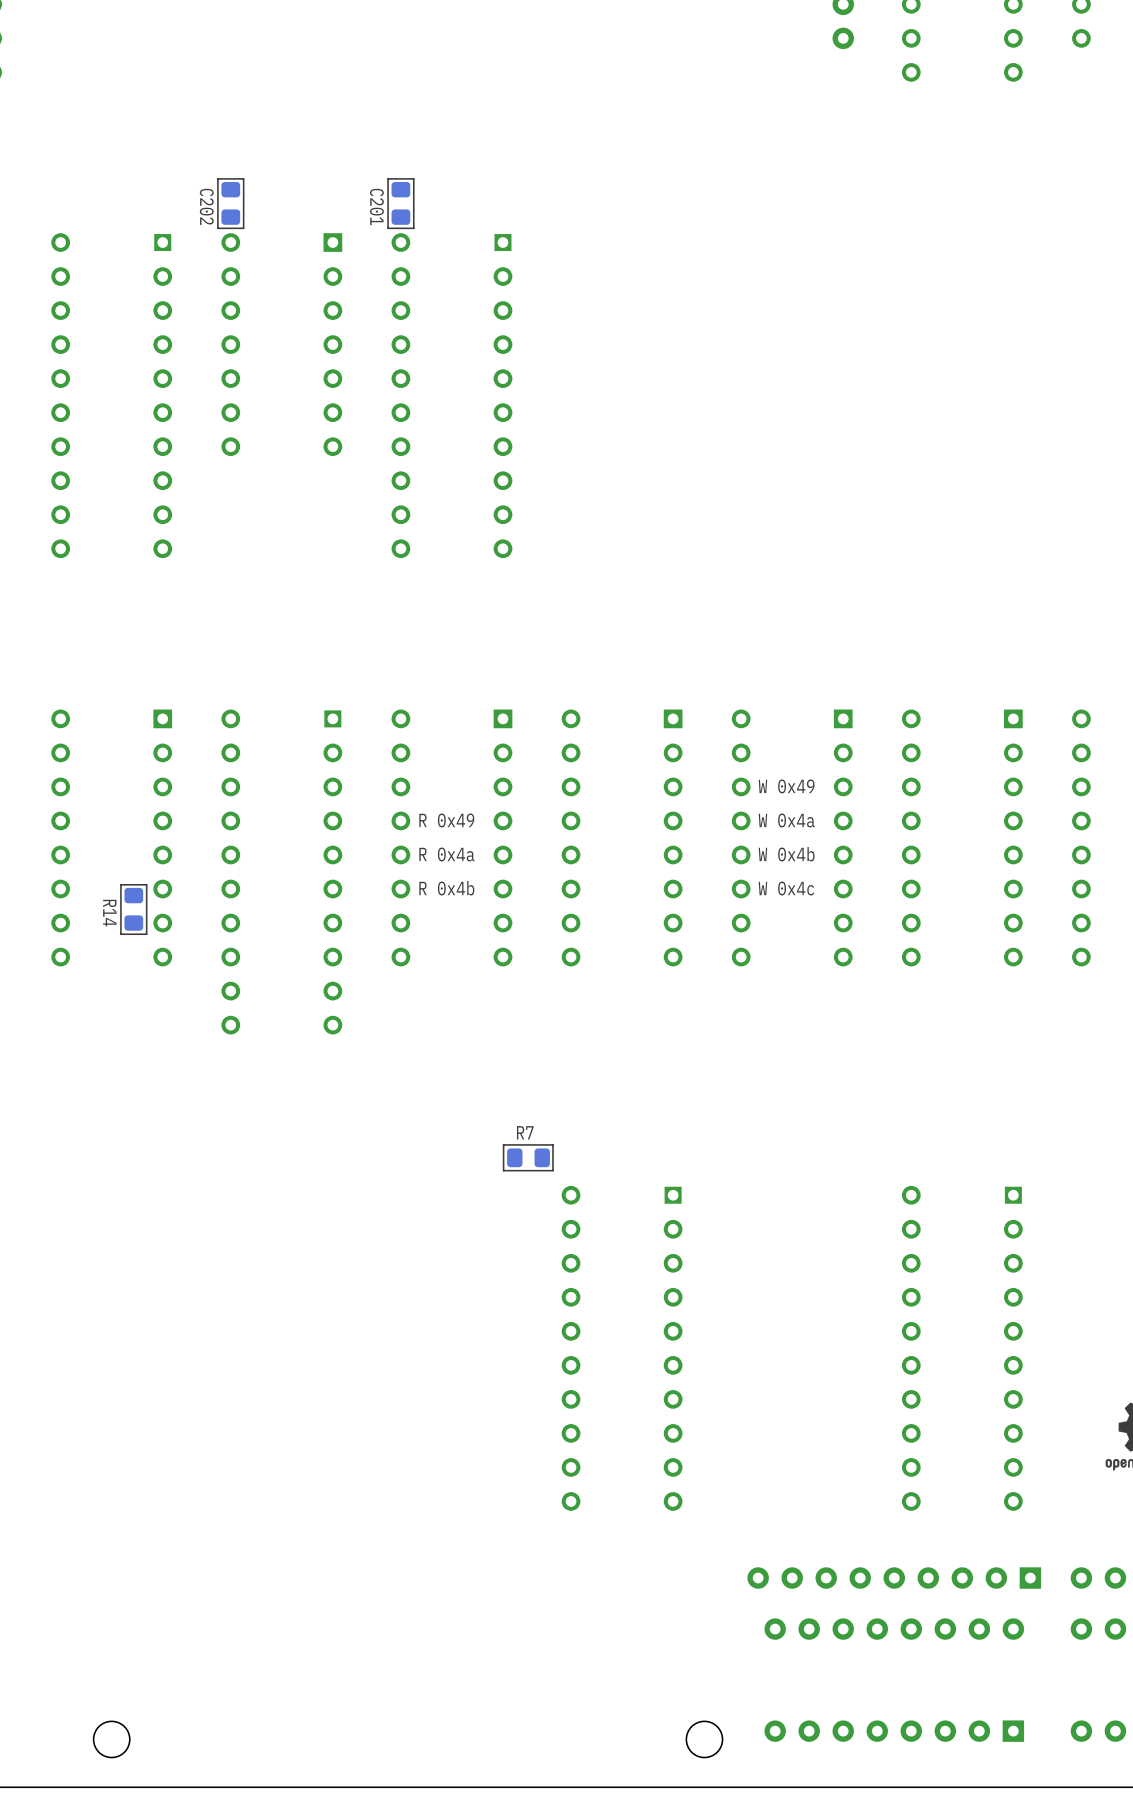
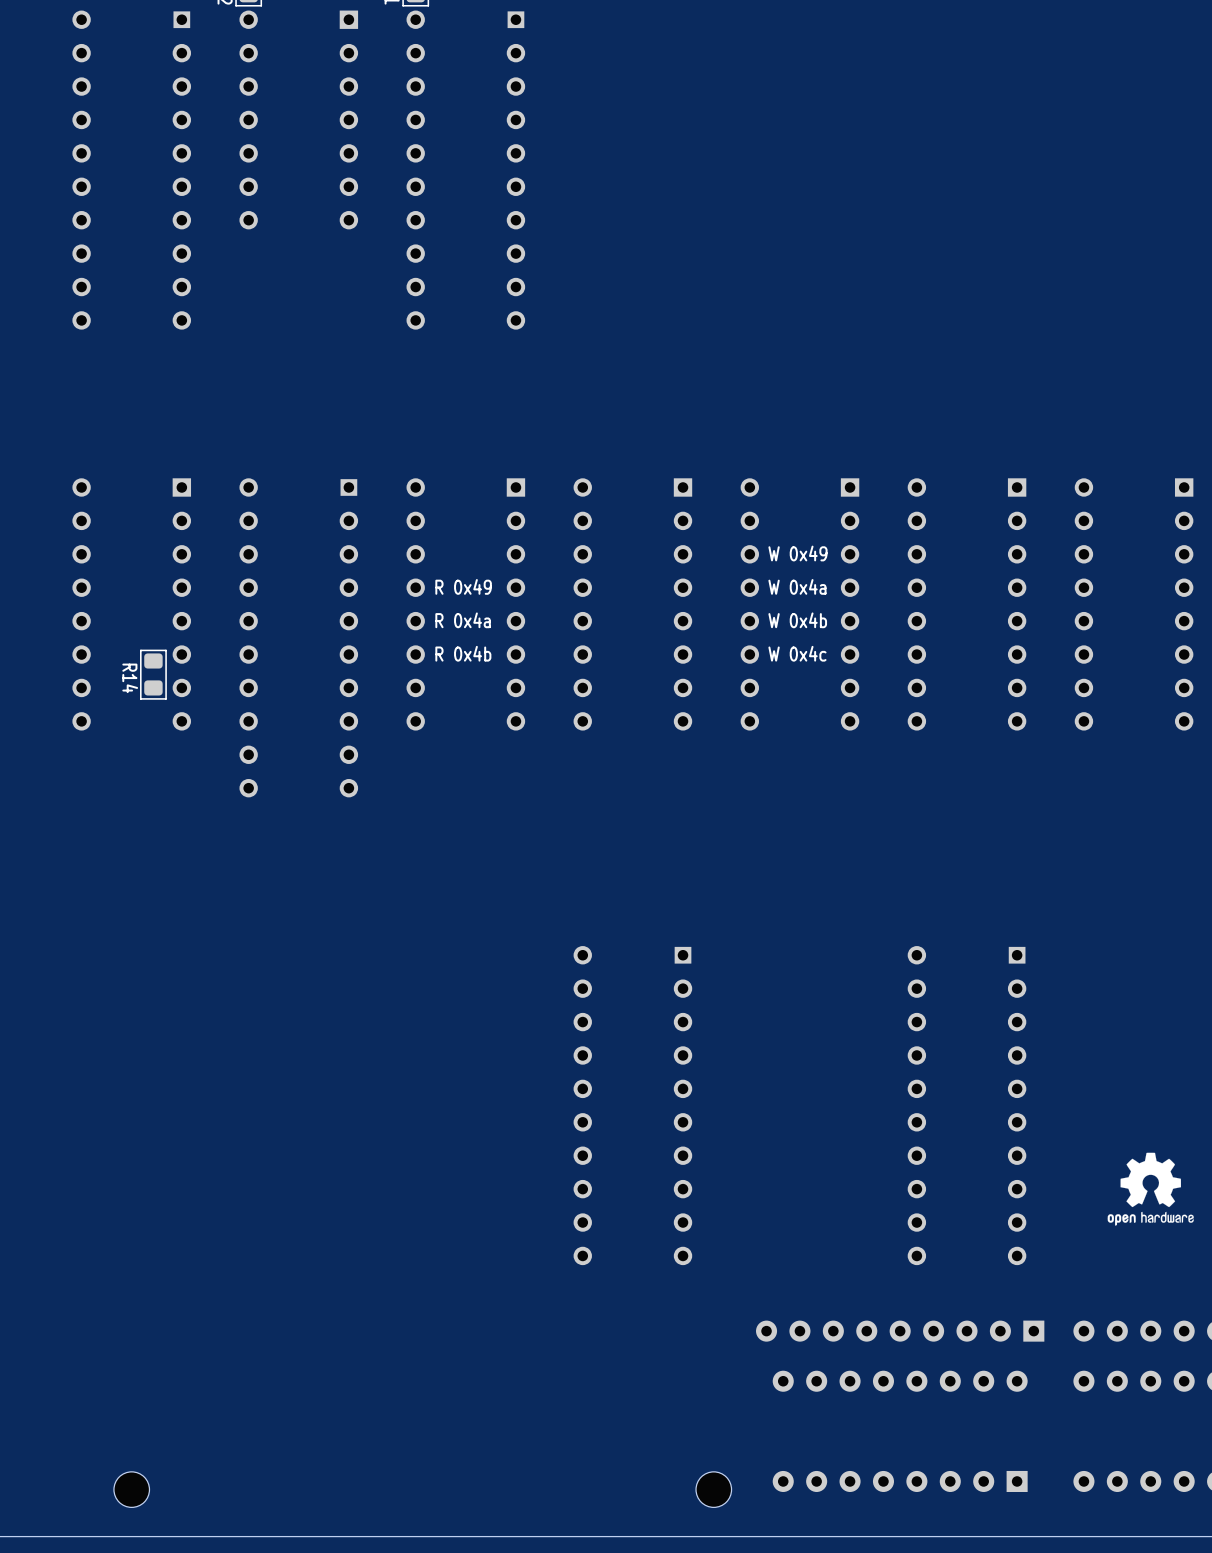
R7: (528, 1157) -> none

